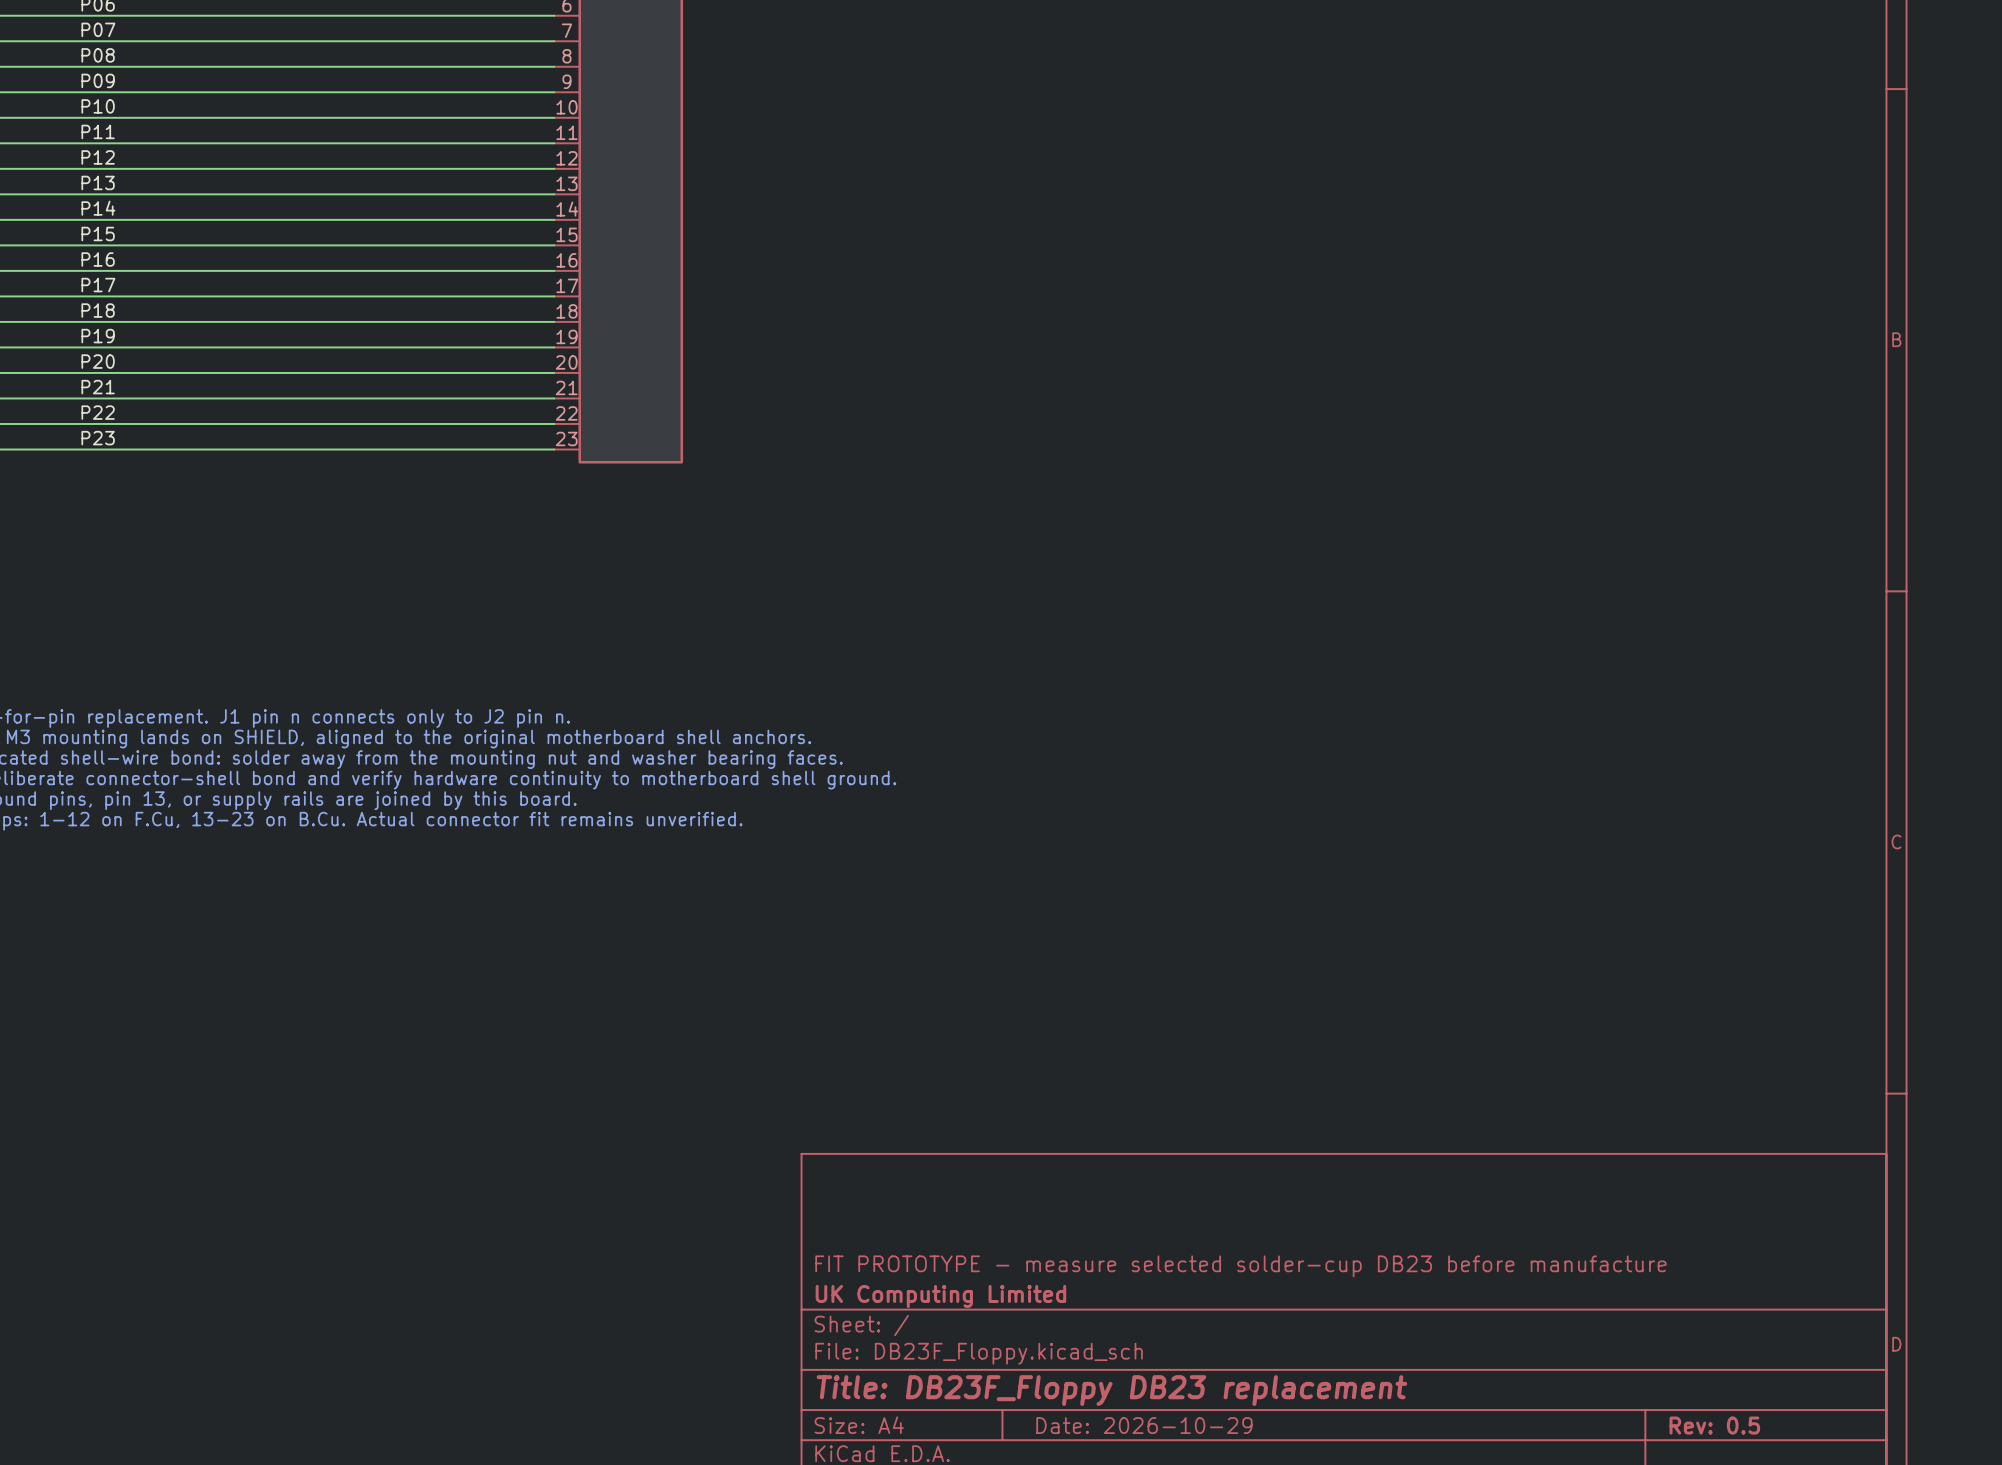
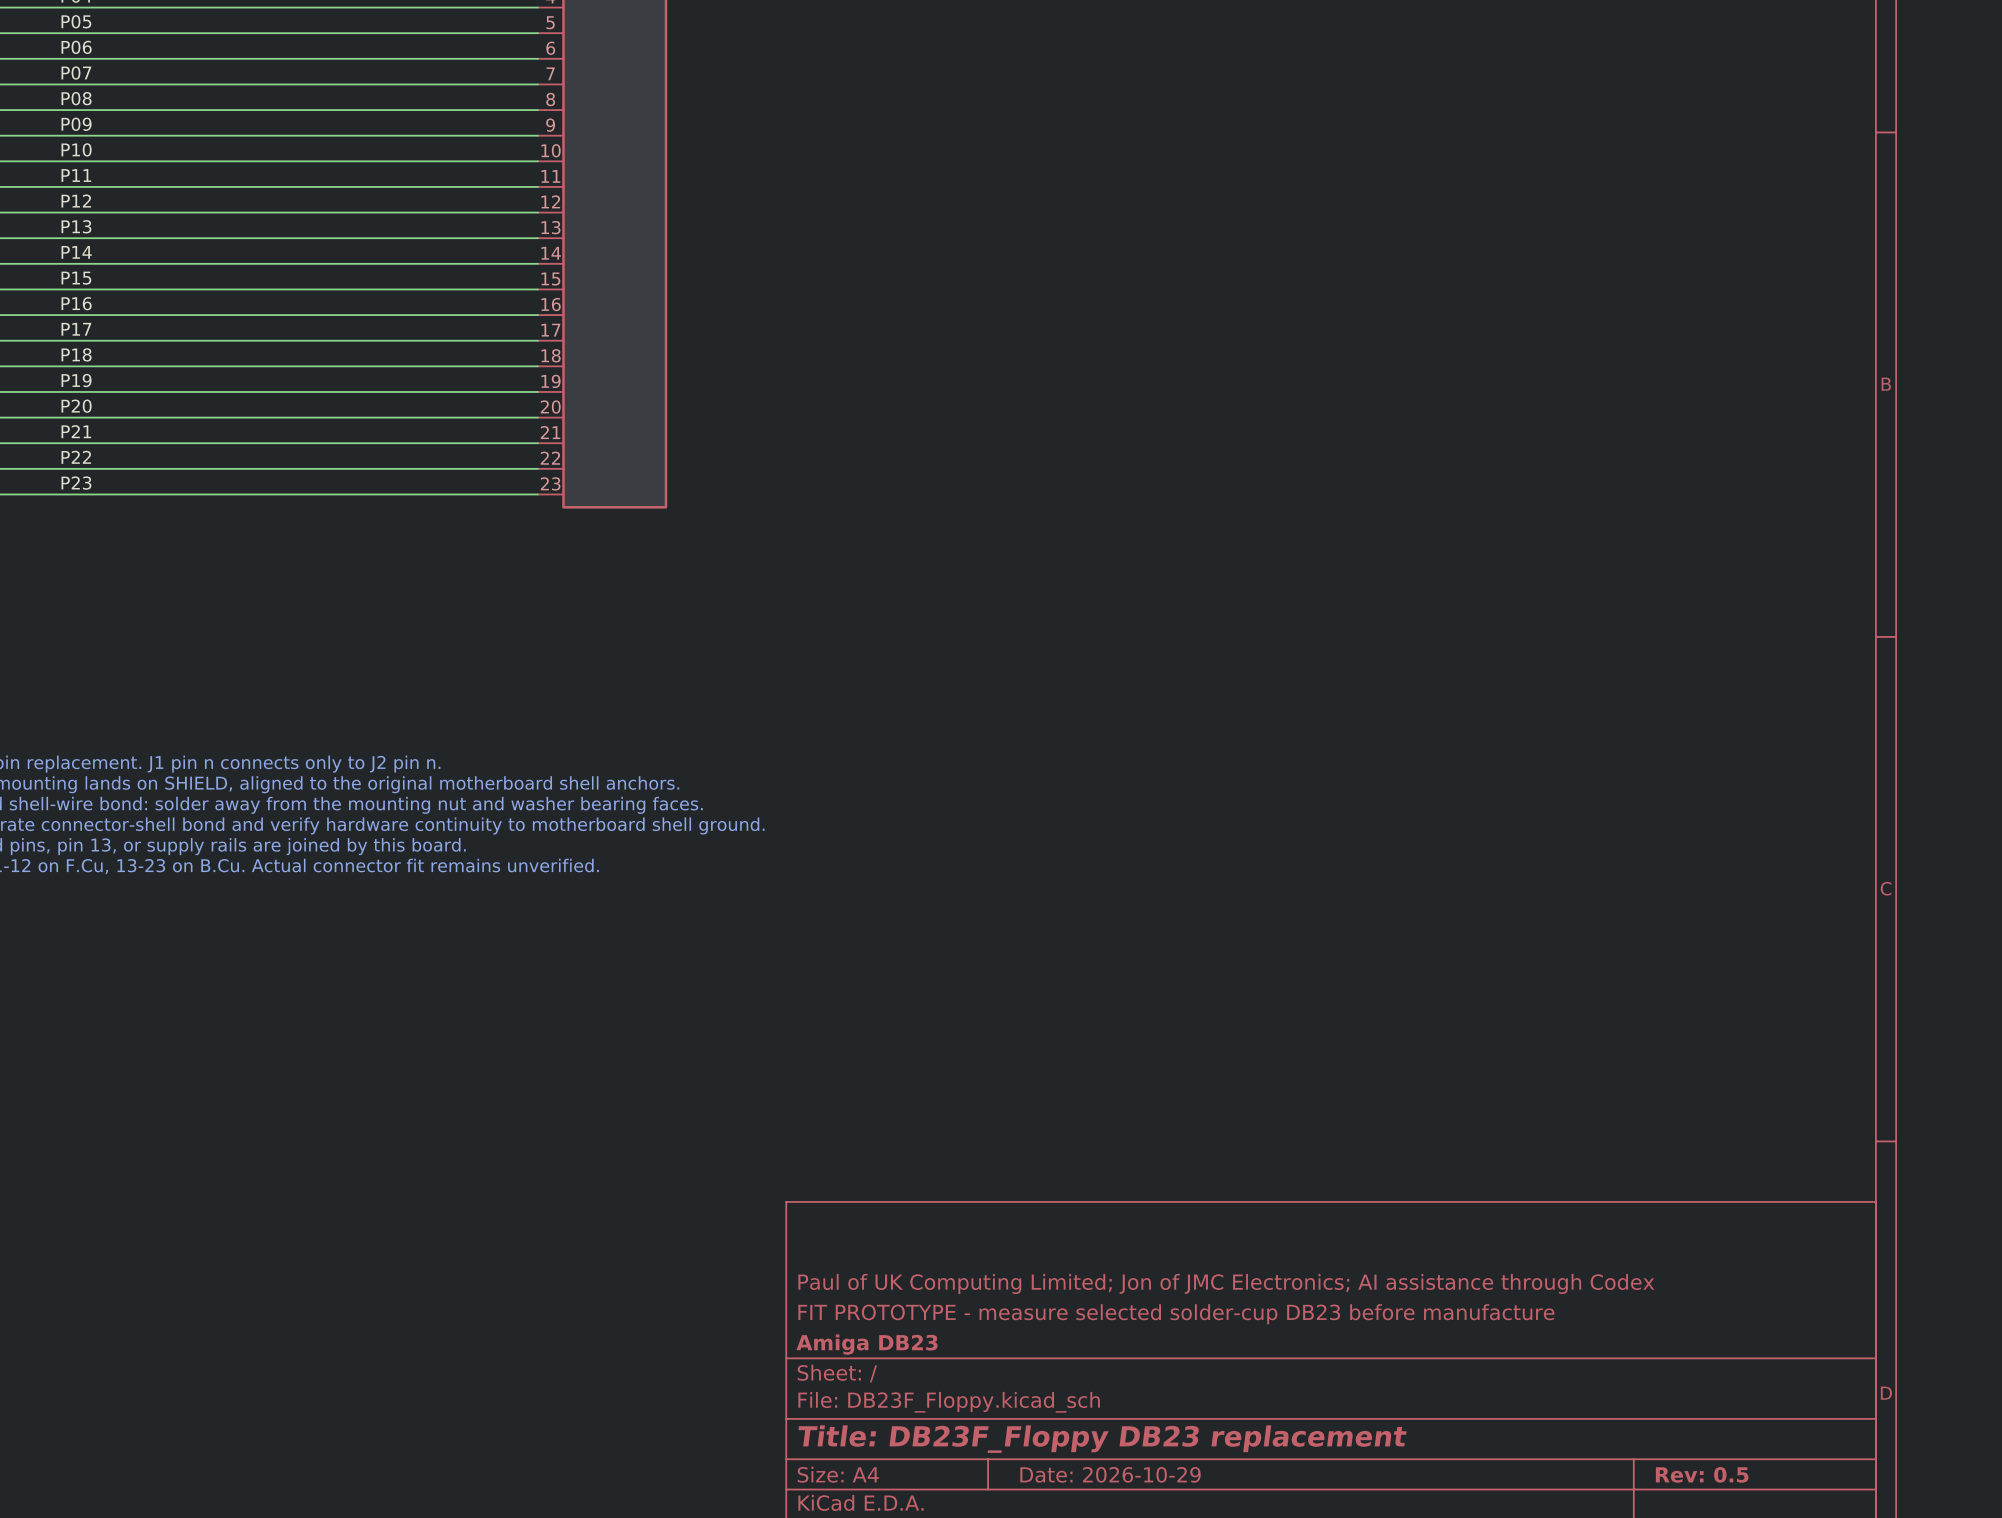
title block: none -> Paul of UK Computing Limited; Jon of JMC Electronics; AI assistance through Codex (1226, 1283)
title block: UK Computing Limited (940, 1296) -> Amiga DB23 (867, 1344)

